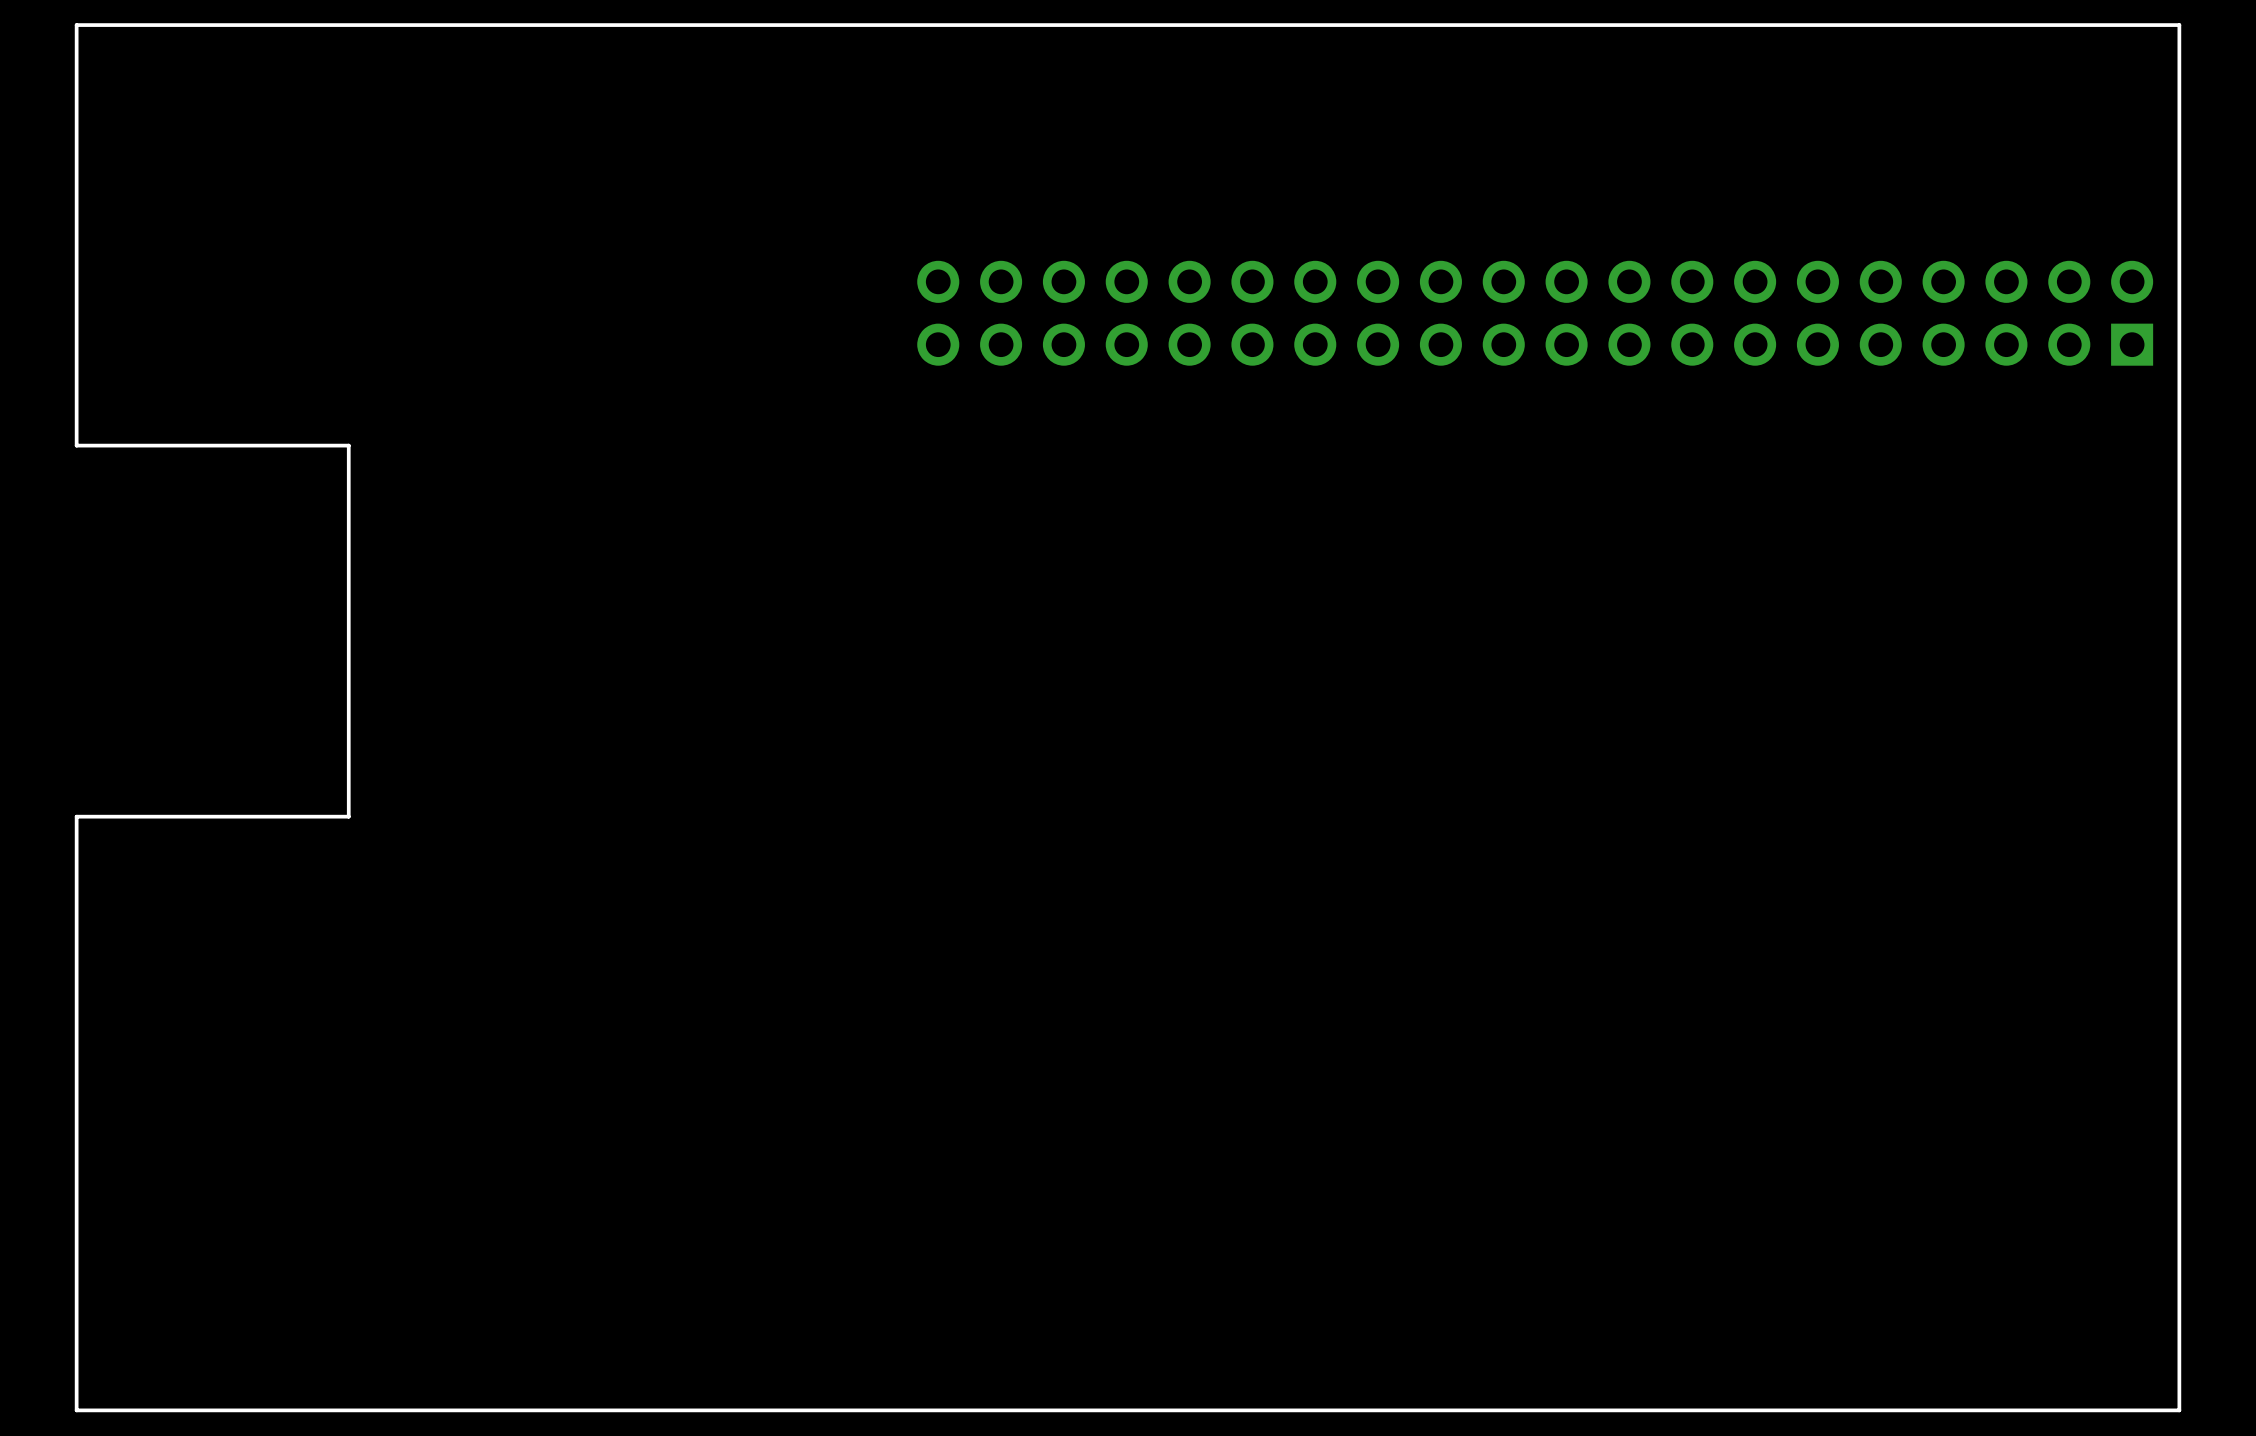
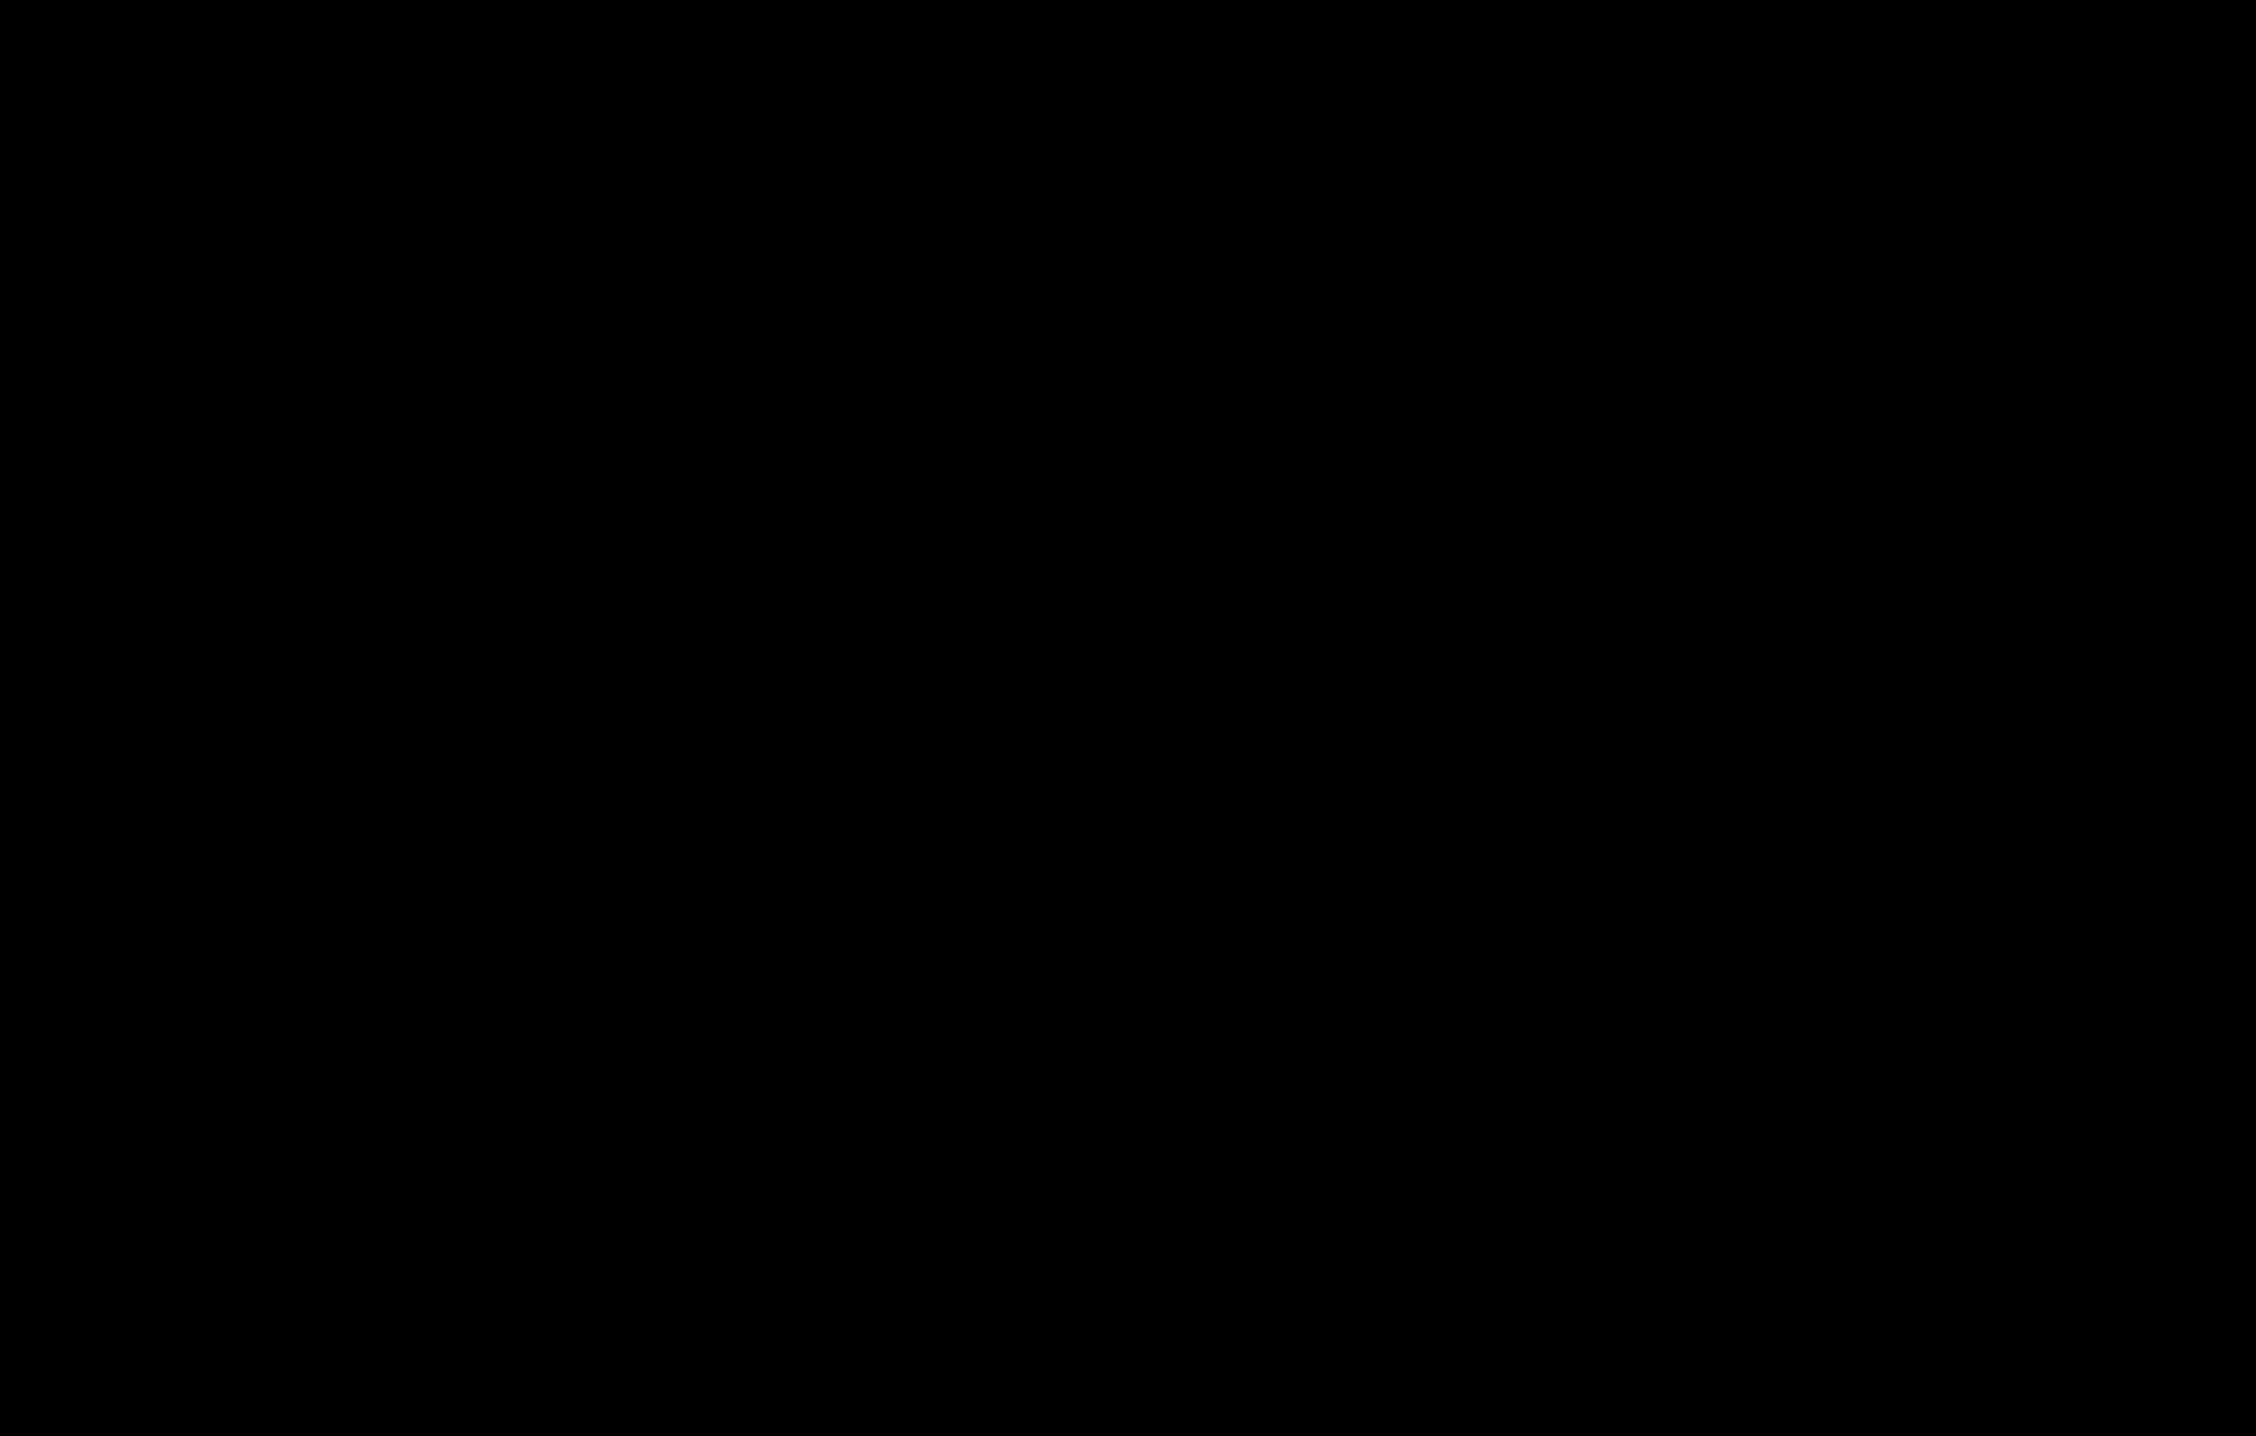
board edge: (2179, 25) (2179, 1410) (76, 1410) (76, 816) (348, 816) (348, 445) (76, 445) (76, 25) (2179, 25) -> none
part: (1535, 313) -> none

